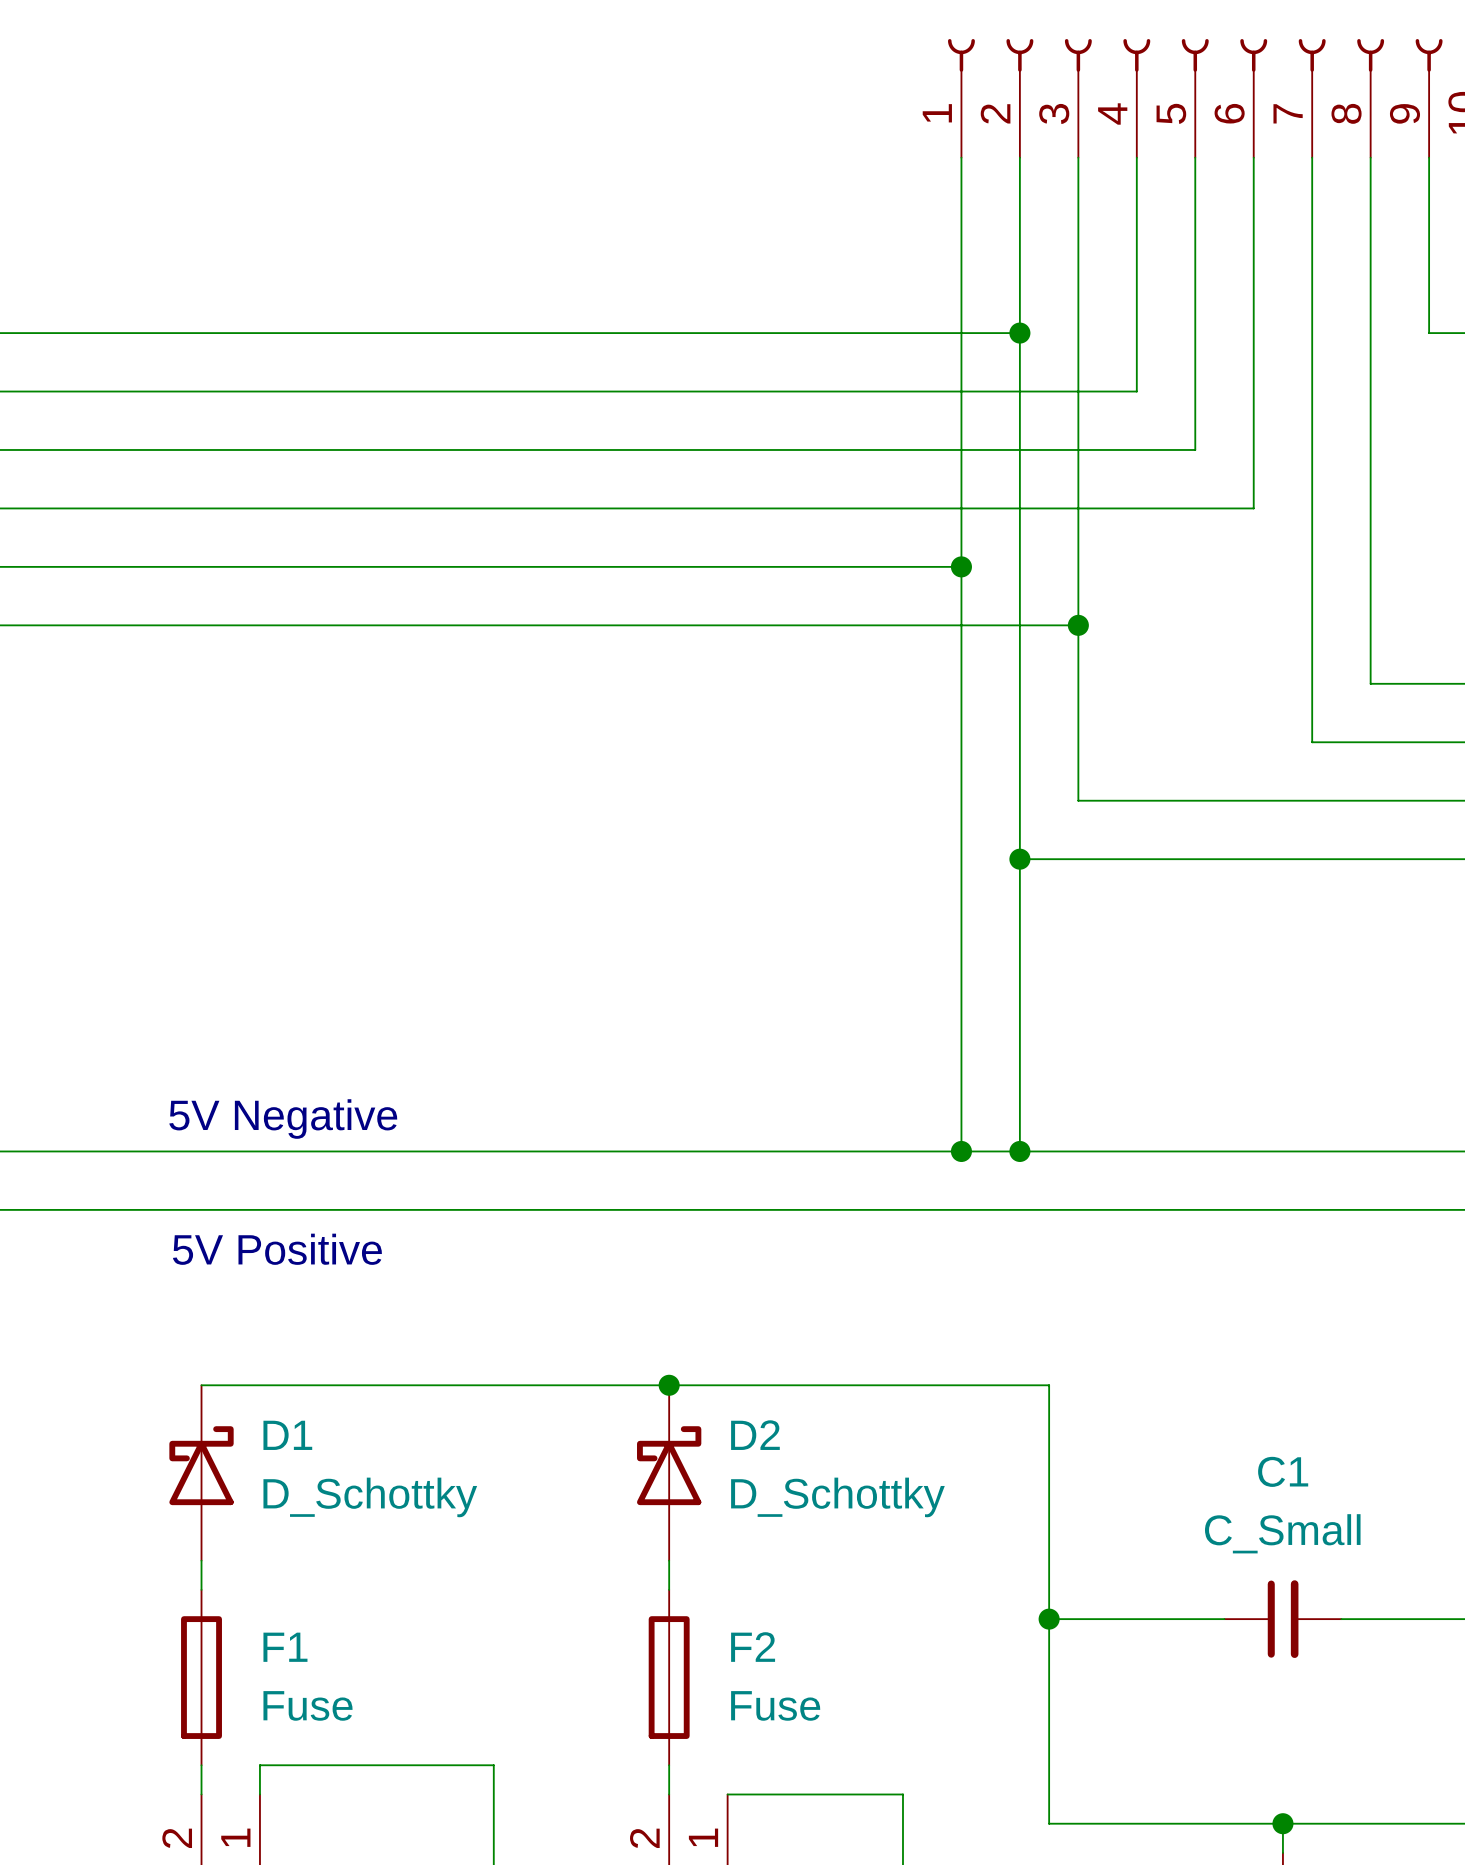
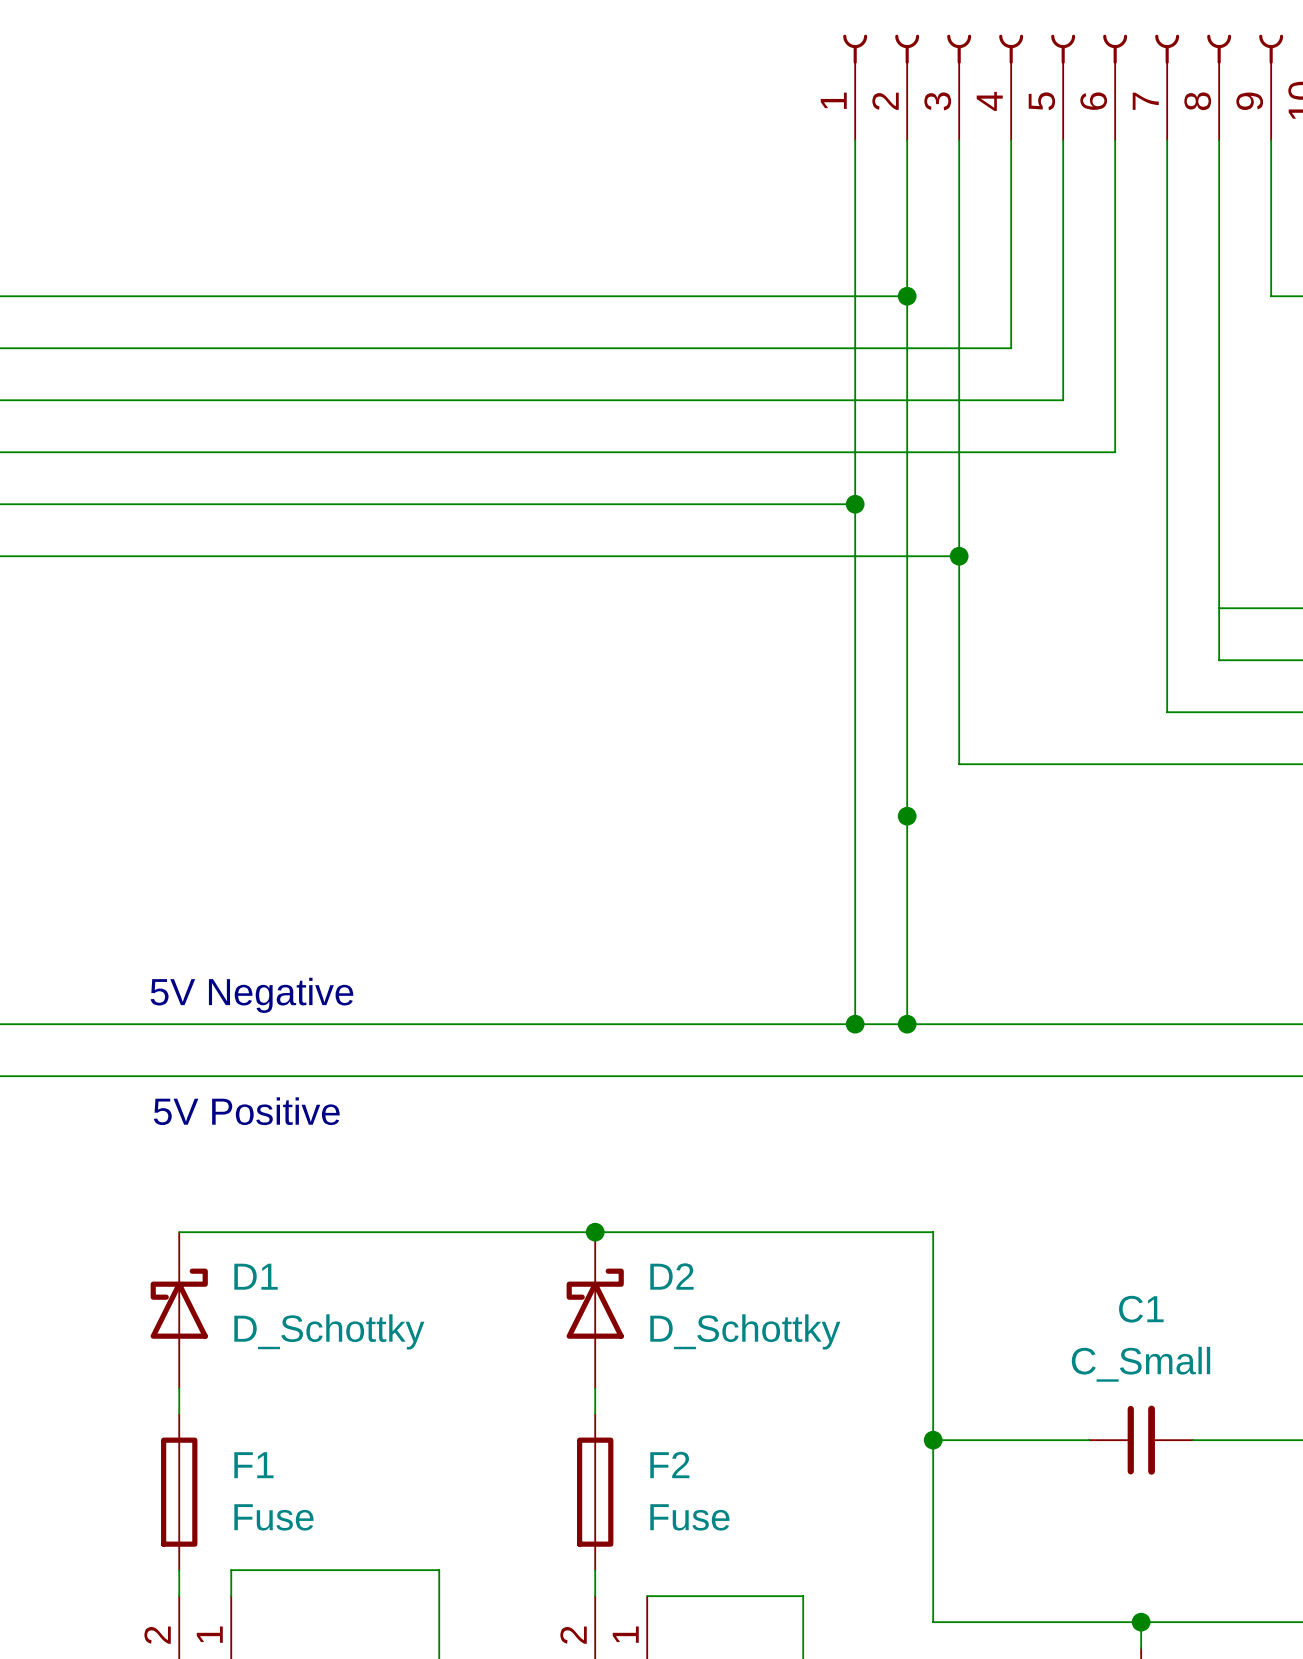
wire: (1312, 742) (1370, 742) -> (1219, 608) (1219, 660)
wire: (1078, 800) (1312, 800) -> (1167, 660) (1167, 712)
wire: (1019, 859) (1078, 859) -> (959, 712) (959, 764)
junction position: (1019, 859) -> (907, 816)

